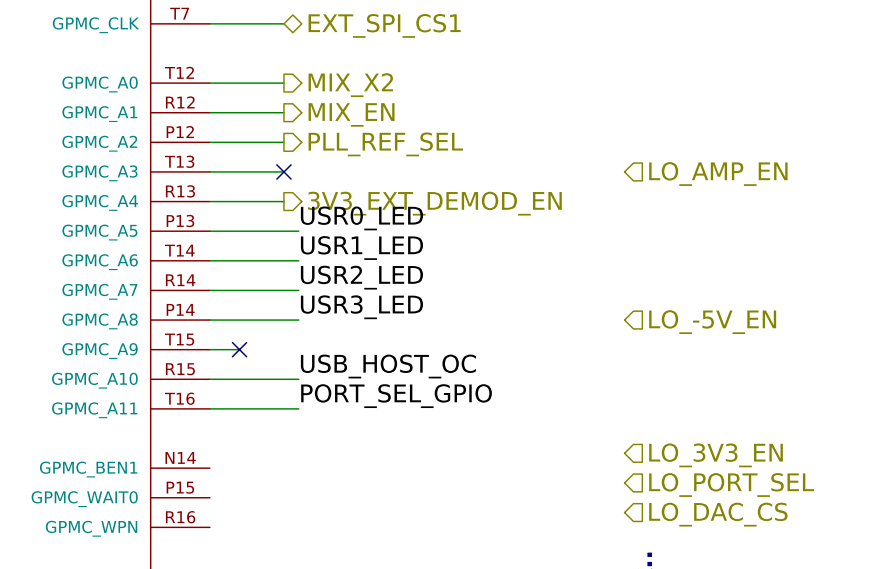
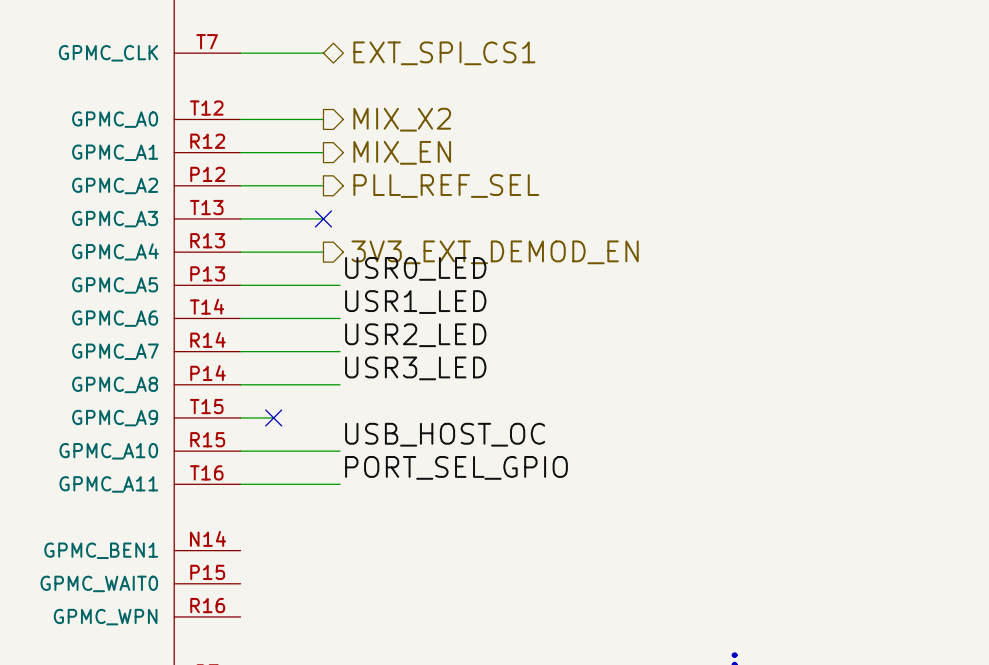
hierarchical label: LO_AMP_EN (718, 174) -> none
hierarchical label: LO_-5V_EN (712, 322) -> none
hierarchical label: LO_3V3_EN (716, 455) -> none
hierarchical label: LO_PORT_SEL (731, 485) -> none
hierarchical label: LO_DAC_CS (718, 514) -> none

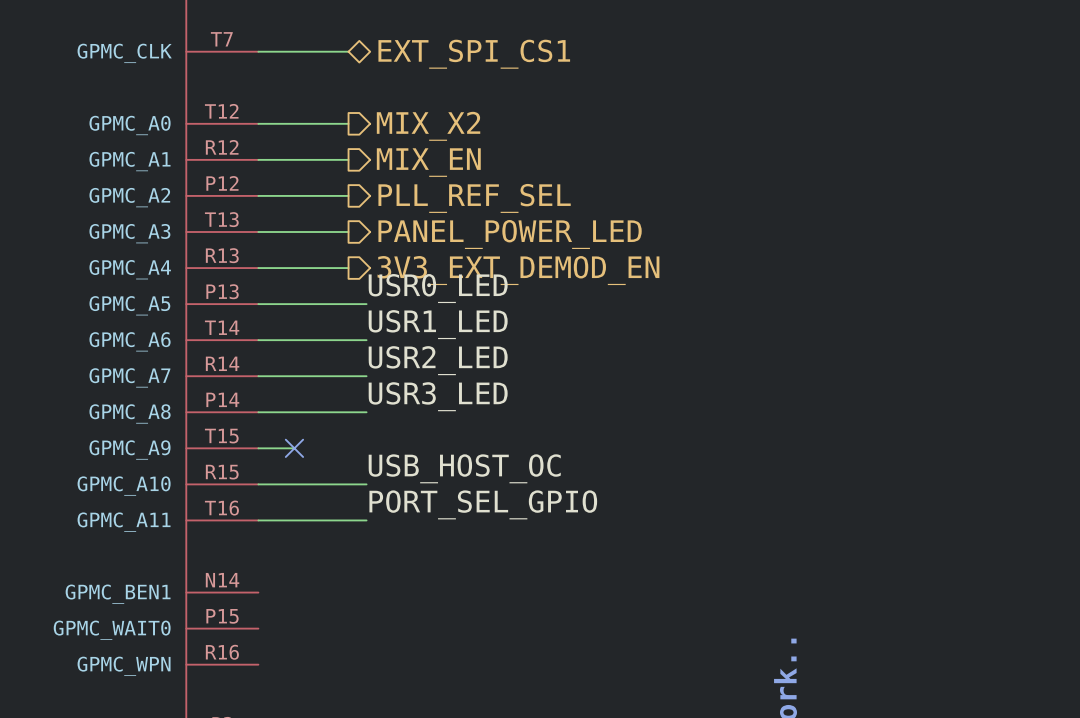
no-connect mark: (323, 218) -> none
hierarchical label: none -> PANEL_POWER_LED (510, 234)

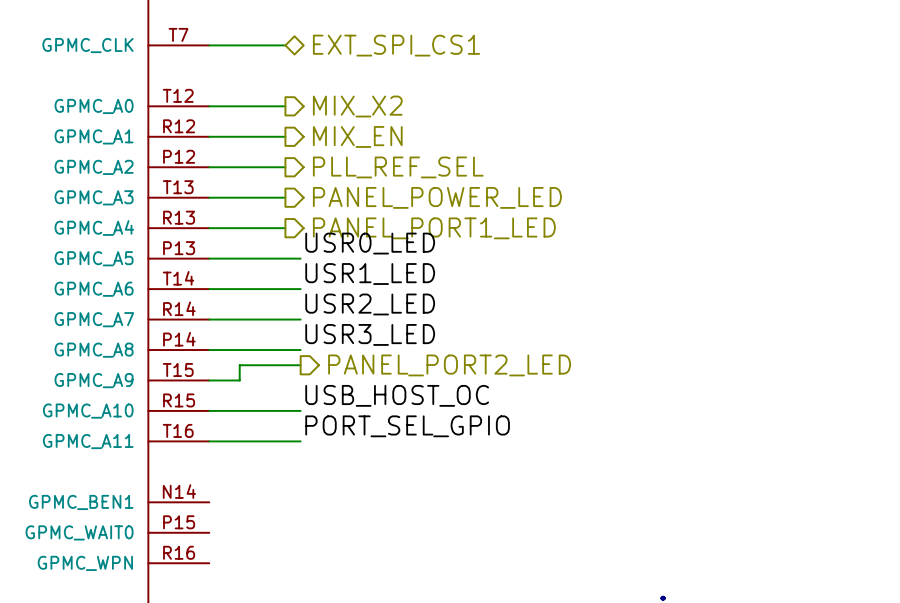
hierarchical label: 3V3_EXT_DEMOD_EN (518, 270) -> PANEL_PORT1_LED (434, 228)
wire: none -> (300, 365) (239, 365) (239, 380)
hierarchical label: none -> PANEL_PORT2_LED (449, 365)
no-connect mark: (294, 448) -> none

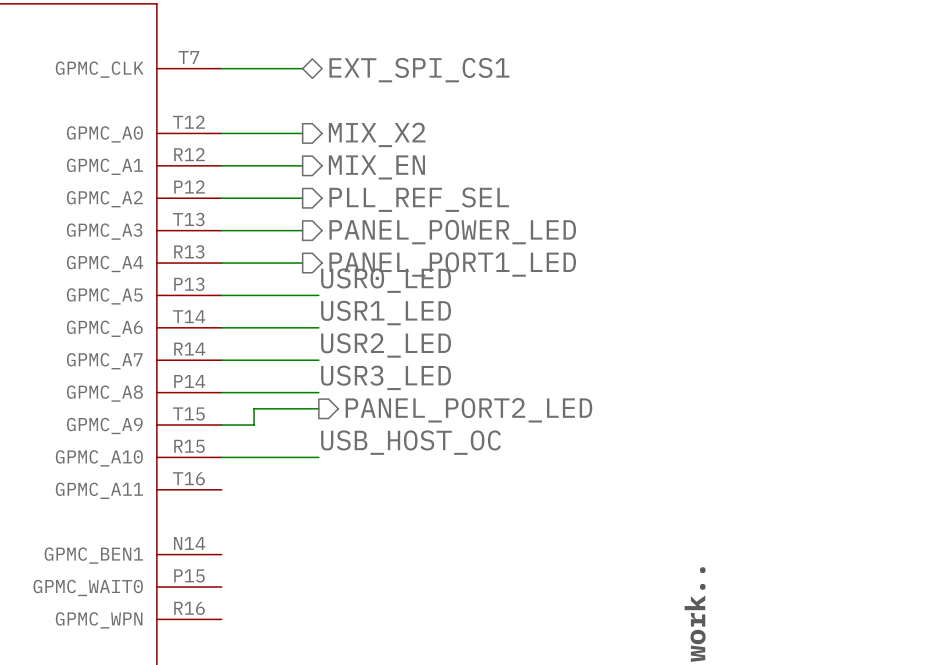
label: PORT_SEL_GPIO (407, 426) -> none
wire: (209, 441) (300, 441) -> none

